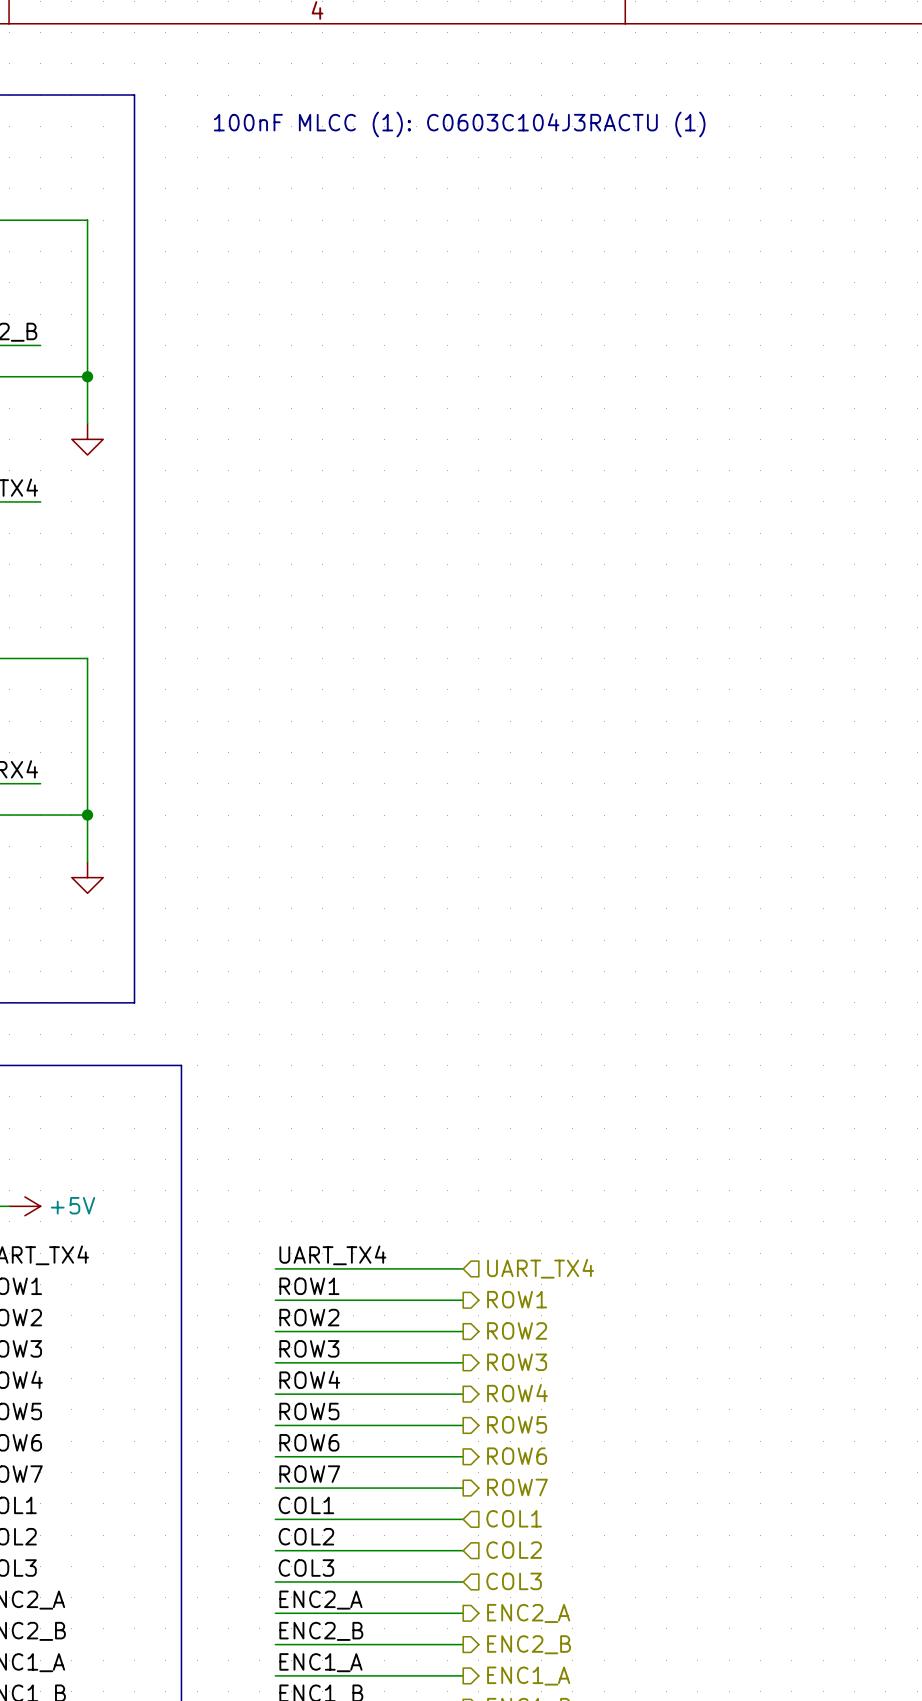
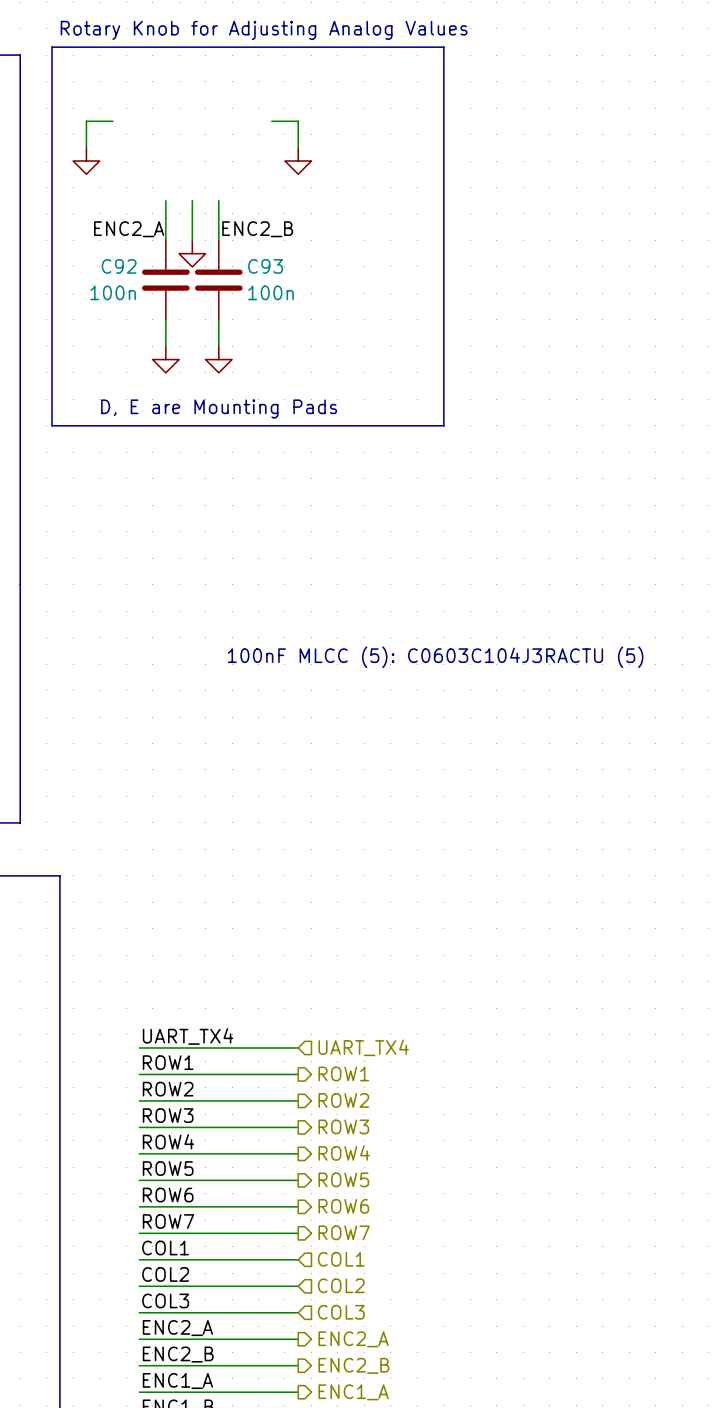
text: none -> Rotary Knob for Adjusting Analog Values (264, 30)
line: none -> (51, 47) (443, 47) (443, 425) (51, 425) (51, 47)
text: 100nF MLCC (1): C0603C104J3RACTU (1) (459, 124) -> none
wire: none -> (112, 121) (86, 121) (86, 147)
wire: none -> (271, 121) (298, 121) (298, 147)
power symbol: none -> (86, 161)
power symbol: none -> (298, 161)
wire: none -> (165, 200) (165, 240)
wire: none -> (192, 200) (192, 240)
wire: none -> (218, 200) (218, 240)
label: none -> ENC2_A (129, 229)
label: none -> ENC2_B (257, 229)
power symbol: none -> (192, 253)
C92: none -> 100n (165, 280)
C93: none -> 100n (218, 280)
wire: none -> (165, 319) (165, 346)
wire: none -> (218, 319) (218, 346)
power symbol: none -> (165, 359)
power symbol: none -> (218, 359)
text: none -> D, E are Mounting Pads (219, 408)
text: none -> 100nF MLCC (5): C0603C104J3RACTU (5) (435, 657)

